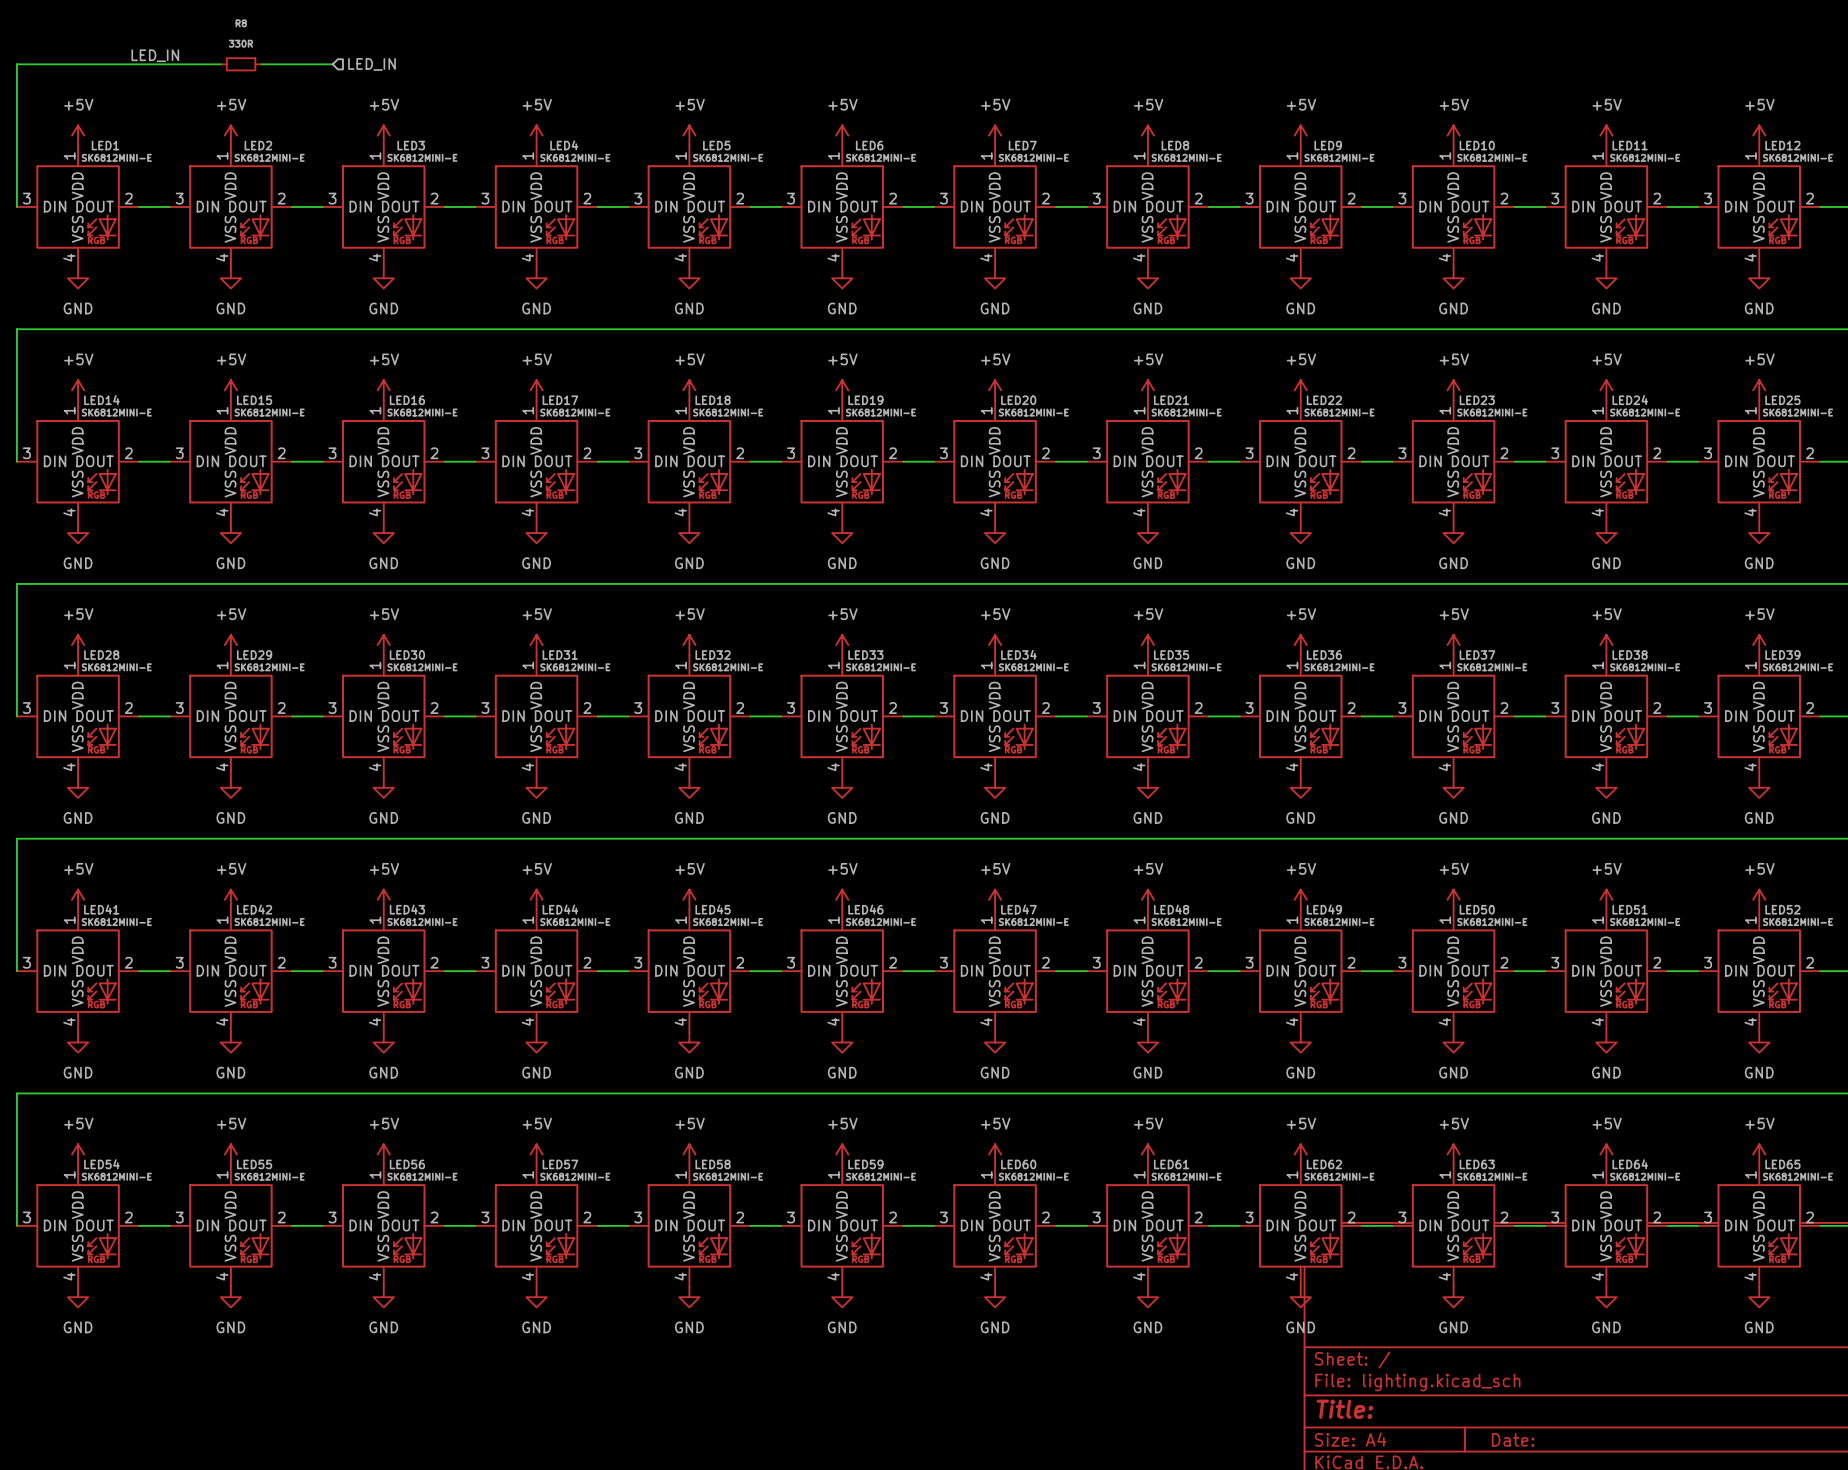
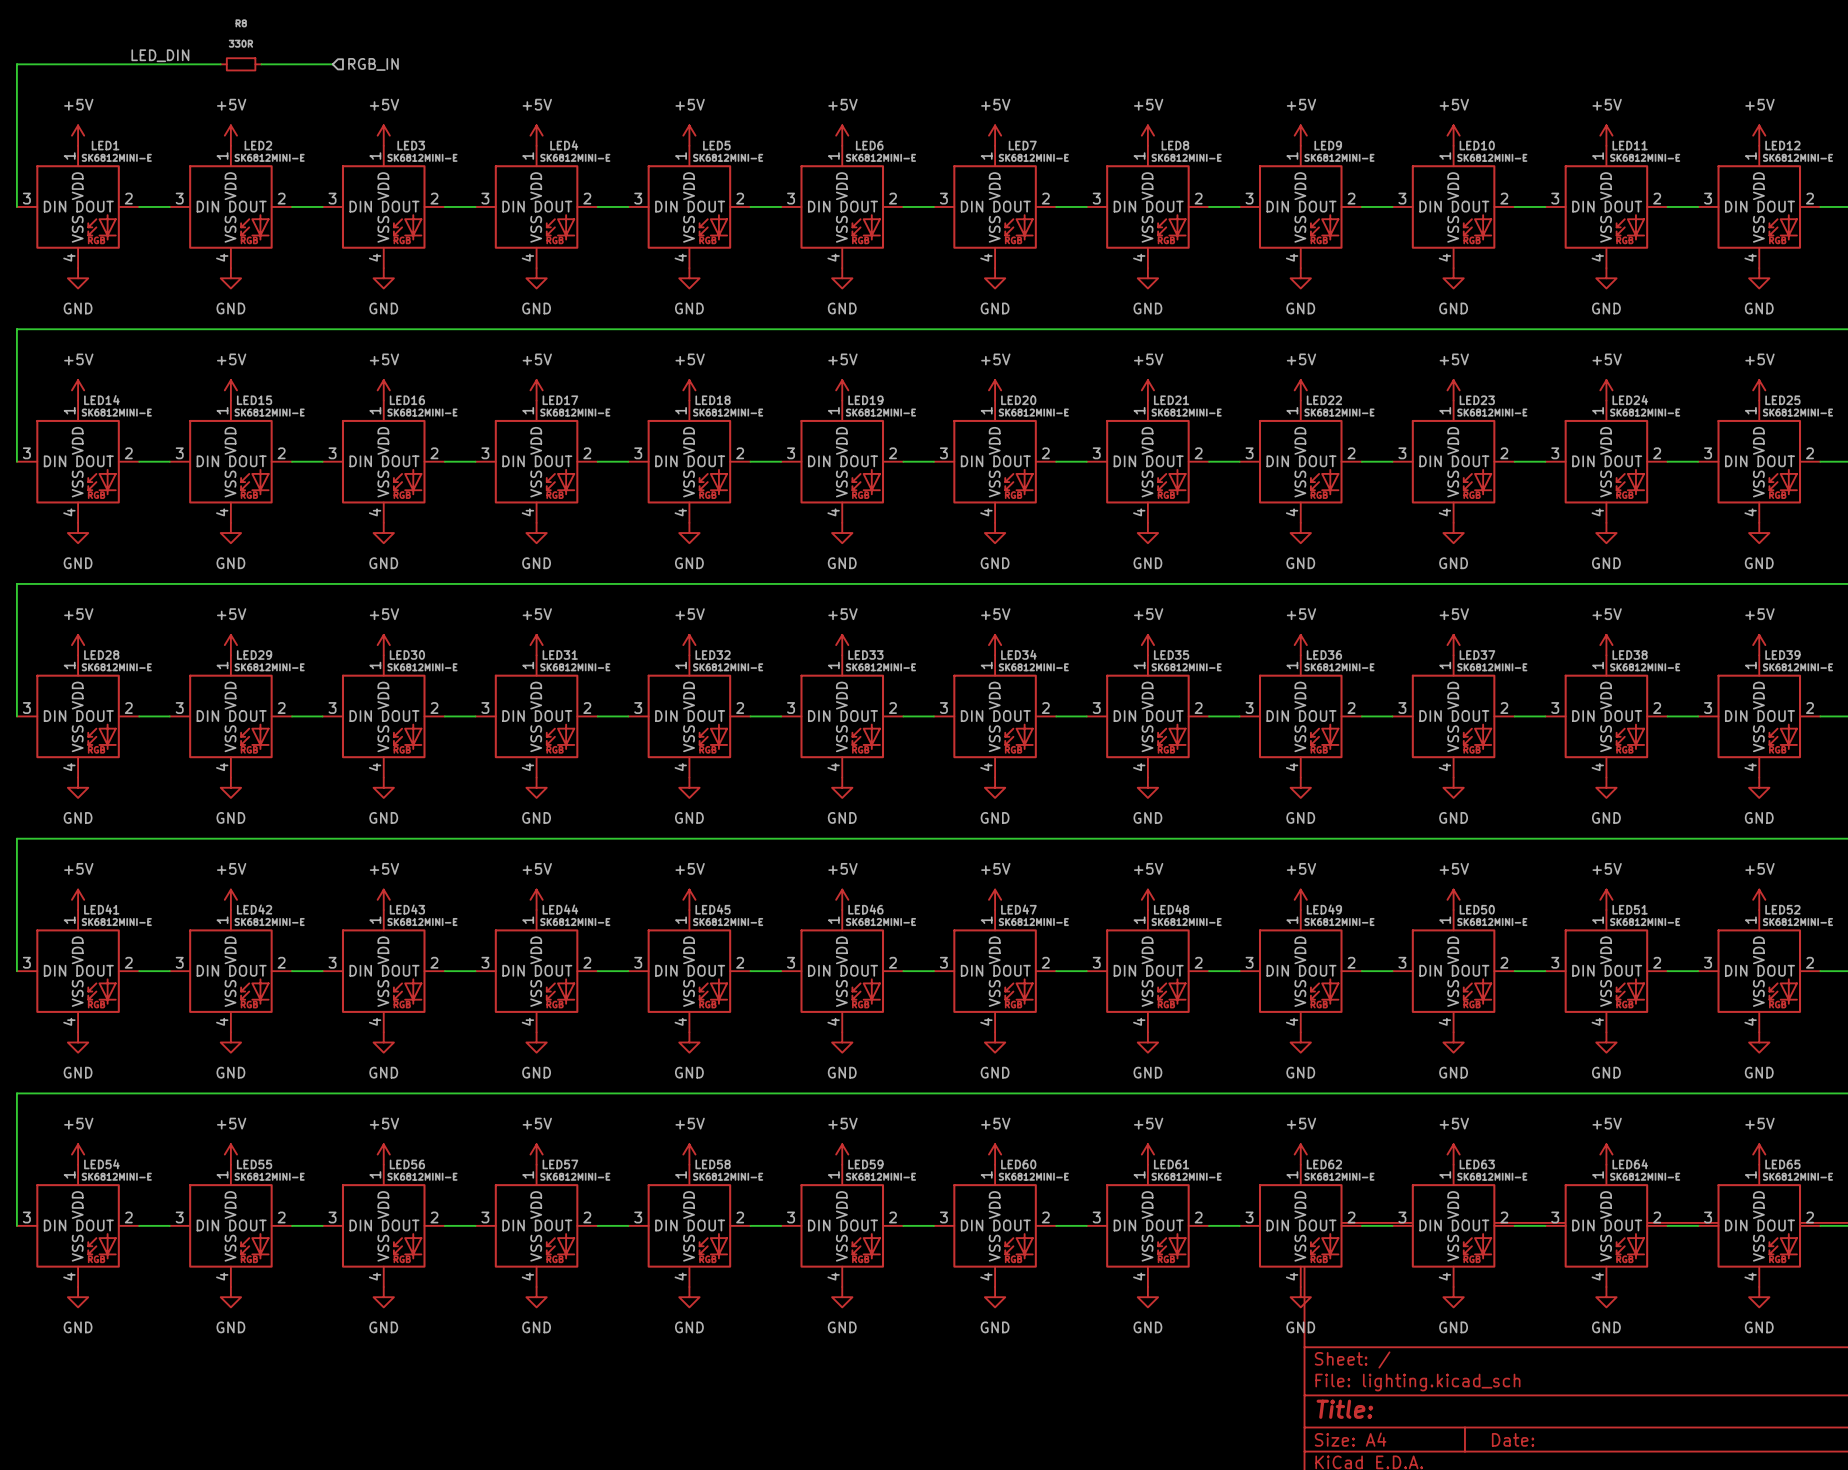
label: LED_IN (155, 55) -> LED_DIN (160, 55)
hierarchical label: LED_IN (372, 64) -> RGB_IN (373, 64)

